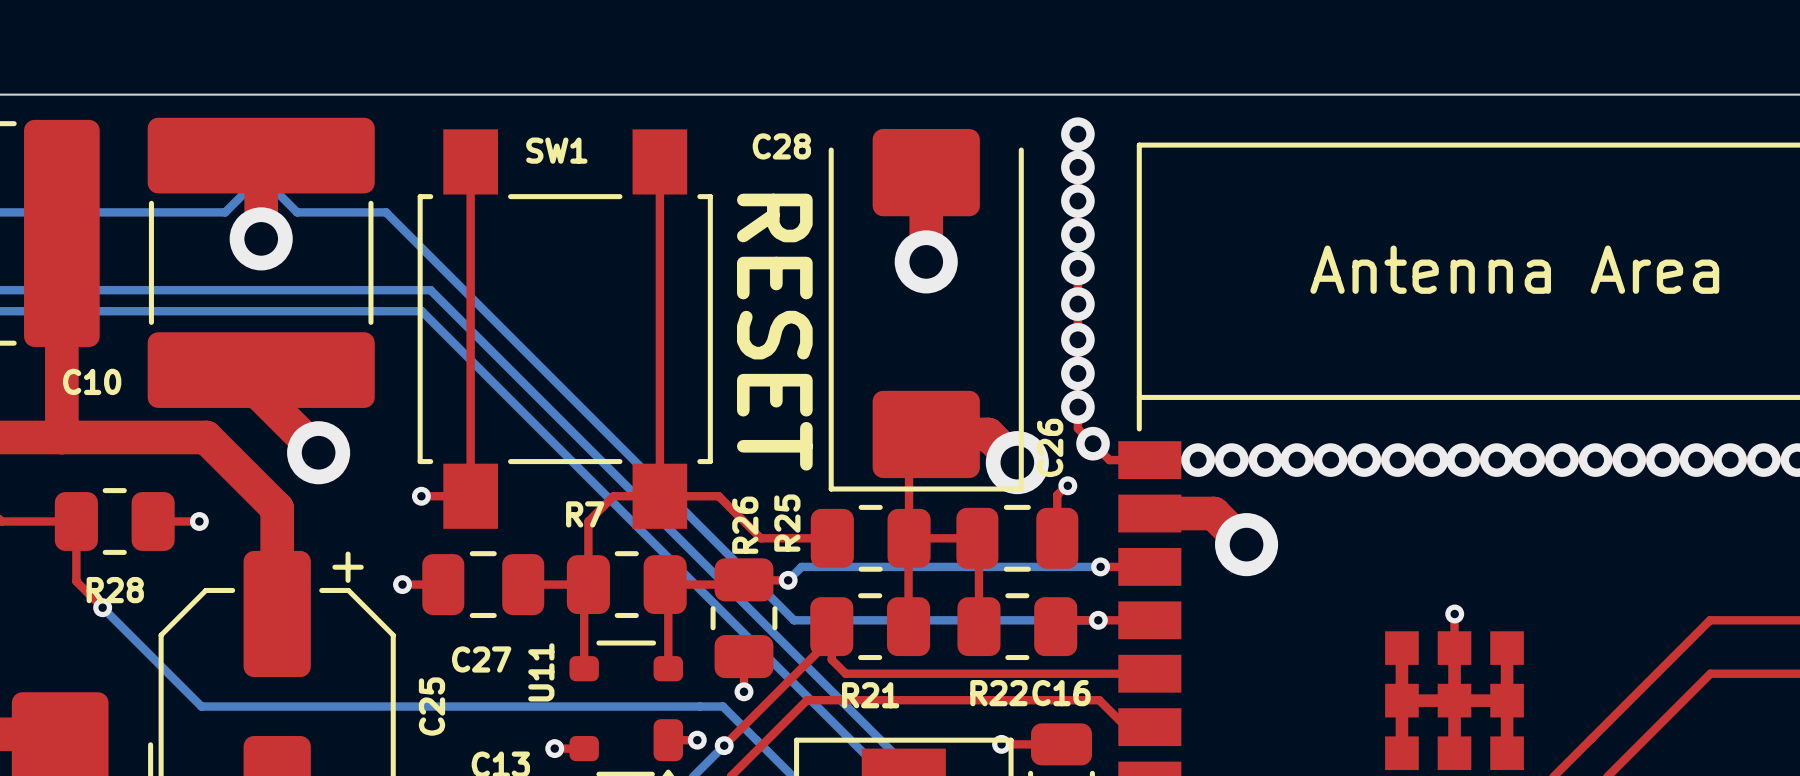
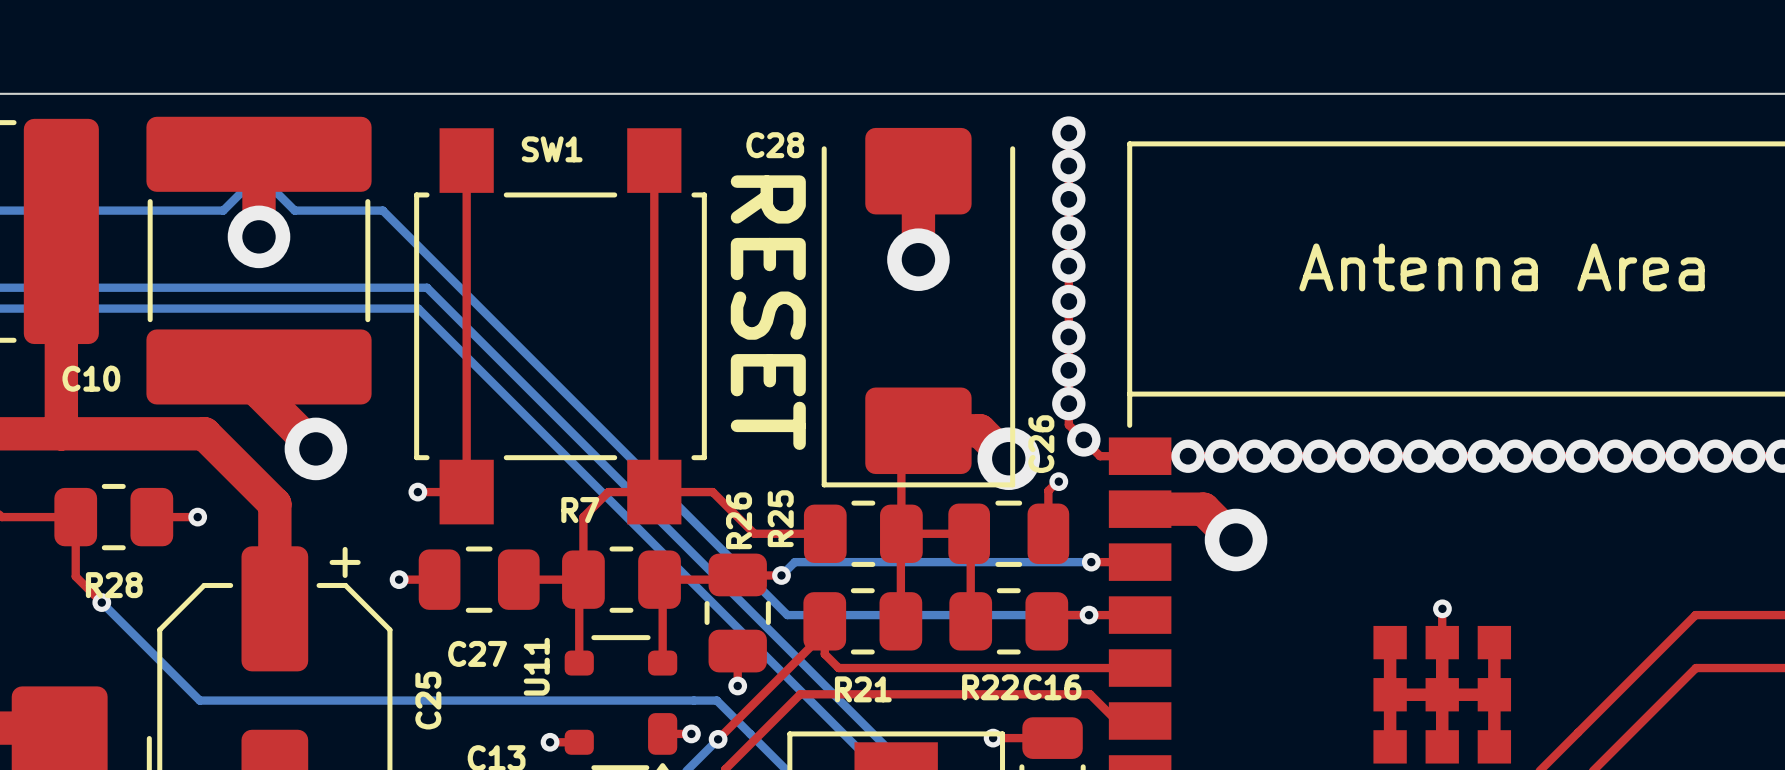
text position: RESET (774, 332) -> RESET (768, 312)

